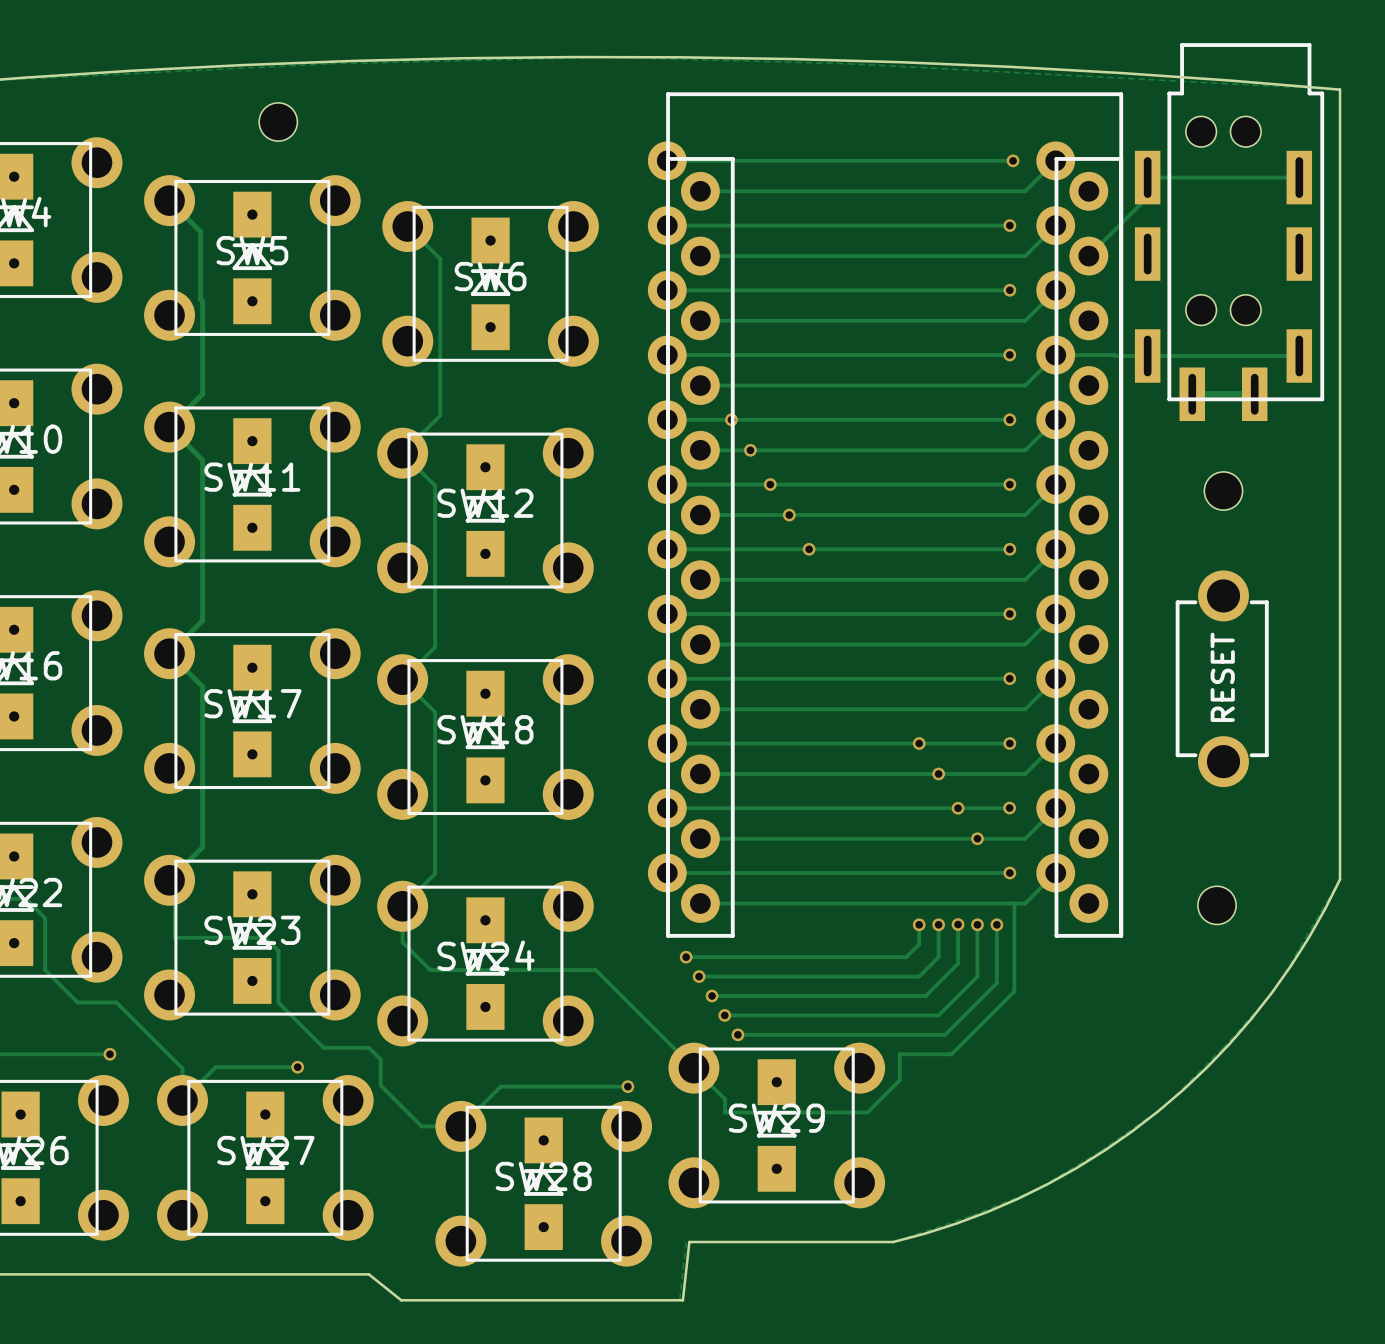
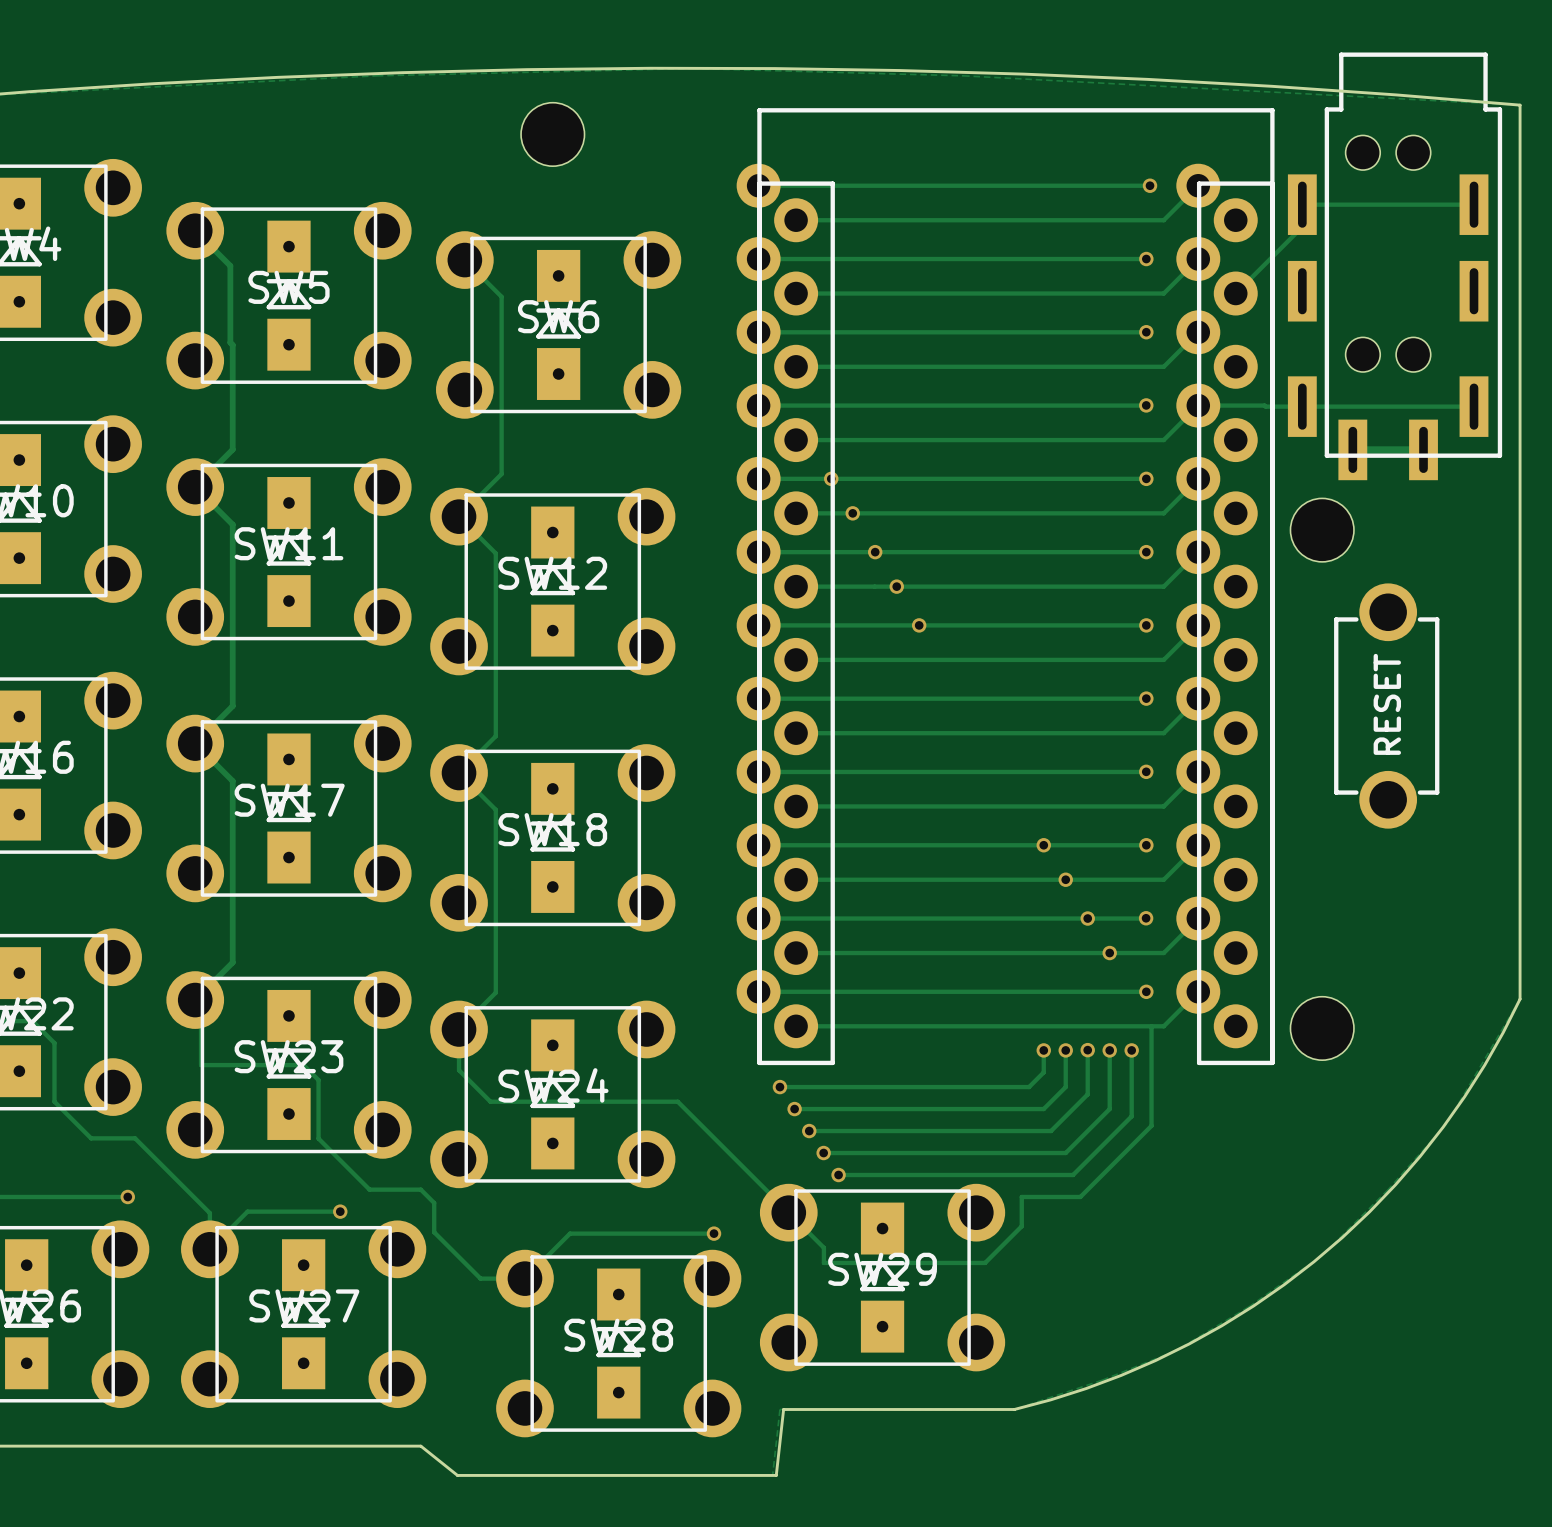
part: none -> (552, 134)
part: (278, 122) -> none
part: none -> (1322, 530)
part: (1223, 491) -> none
part position: (1222, 678) -> (1386, 706)
part: none -> (1322, 1028)
part: (1217, 905) -> none

